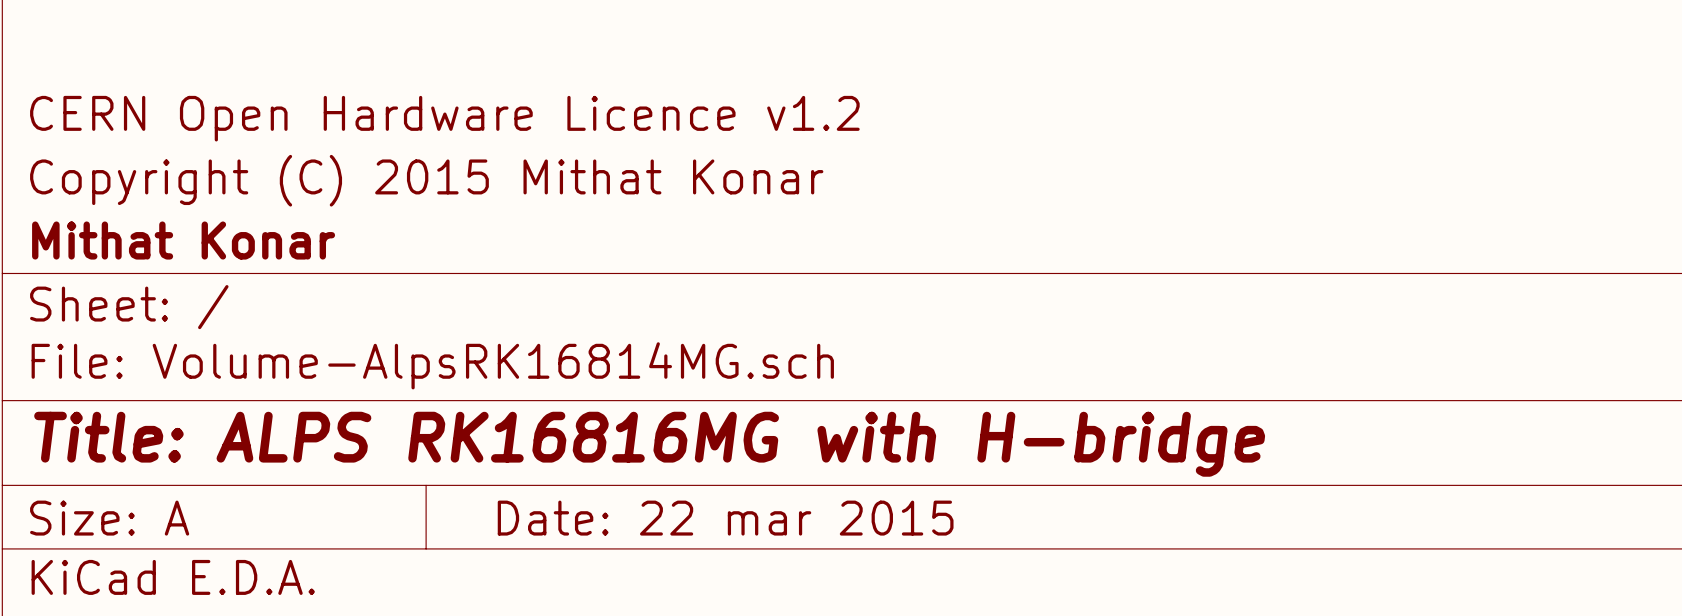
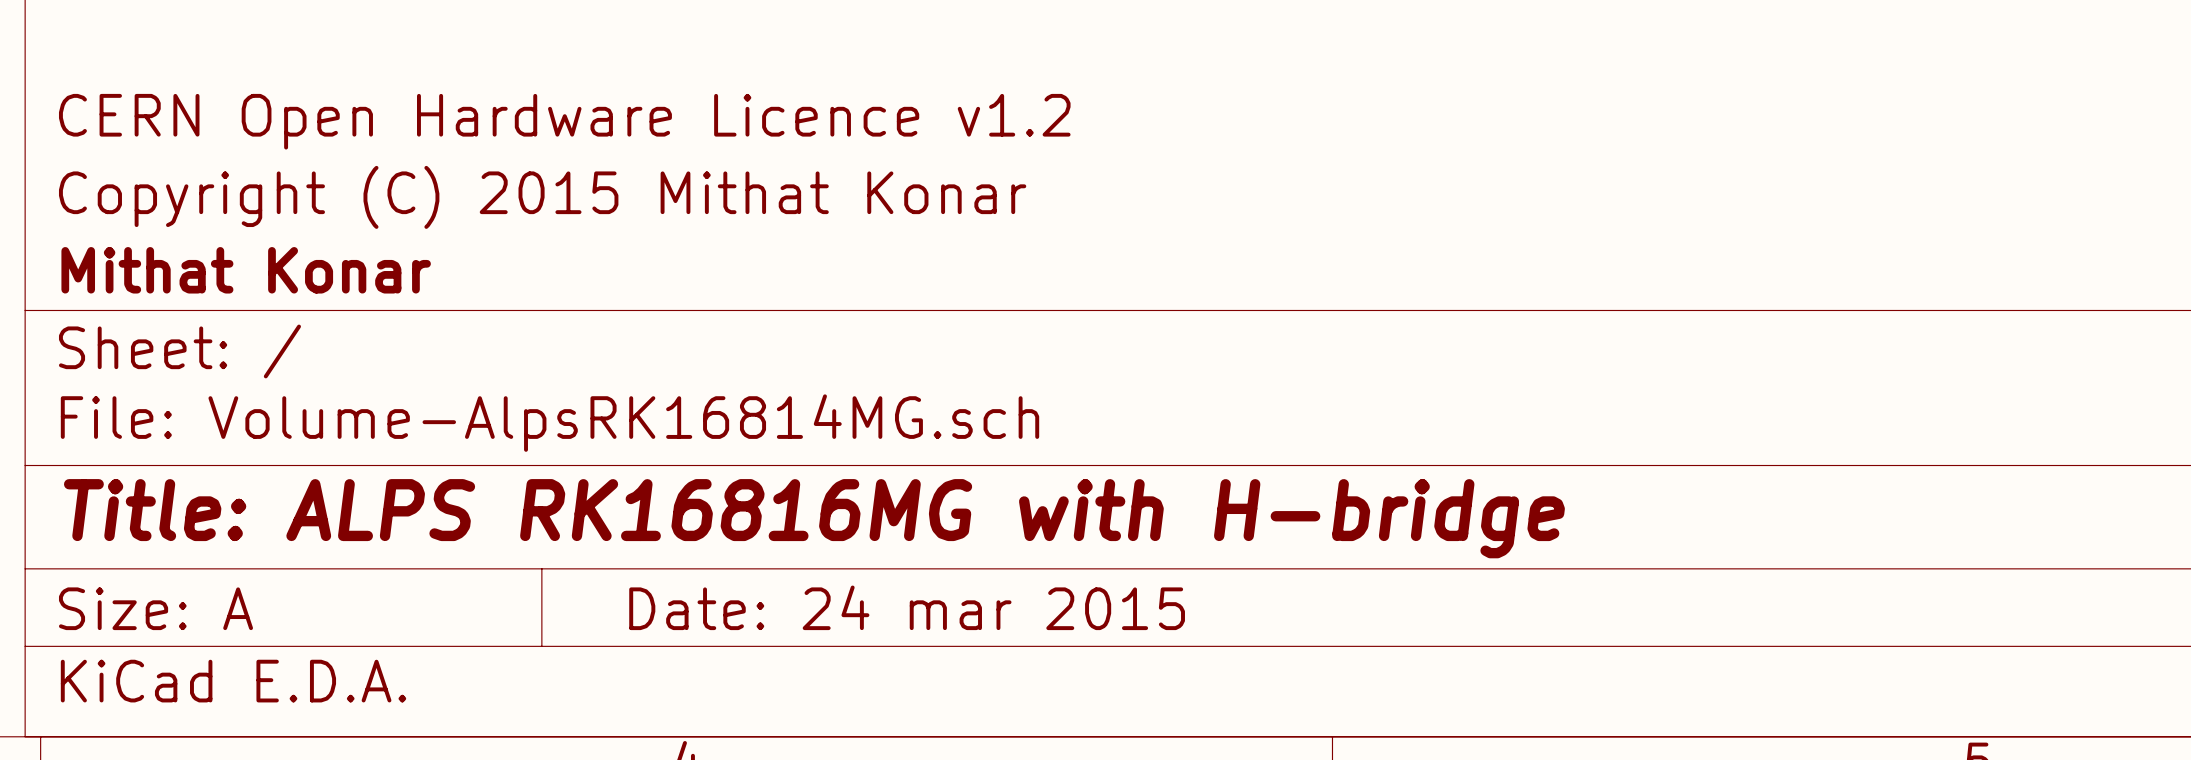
title block: Date: 22 mar 2015 (725, 518) -> Date: 24 mar 2015 (907, 607)

